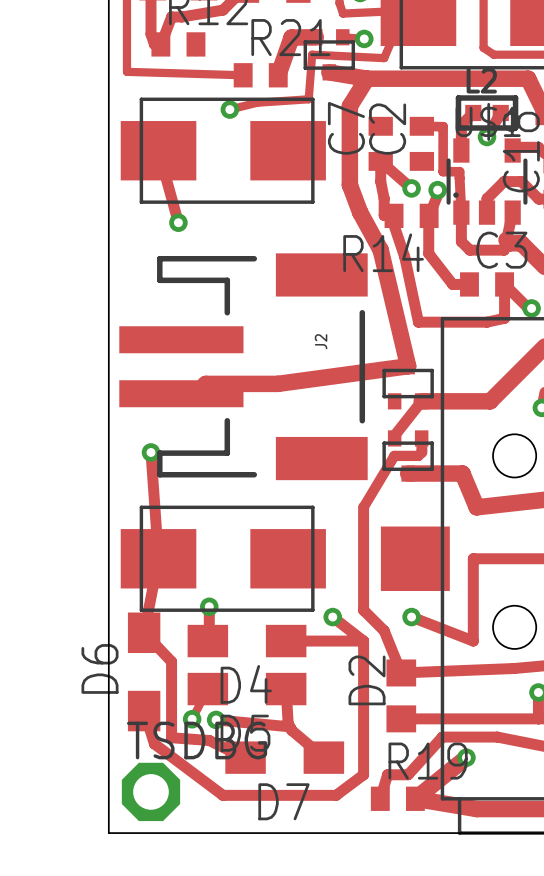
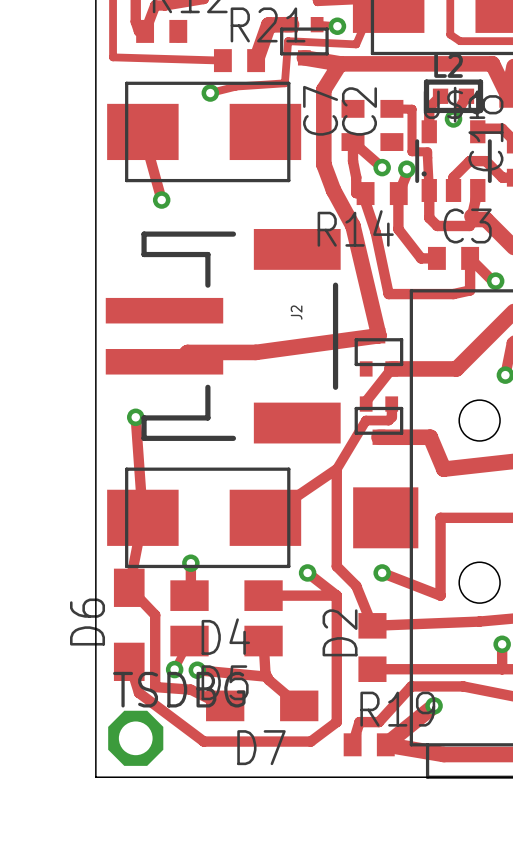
track: none -> (336, 469) (265, 517)

